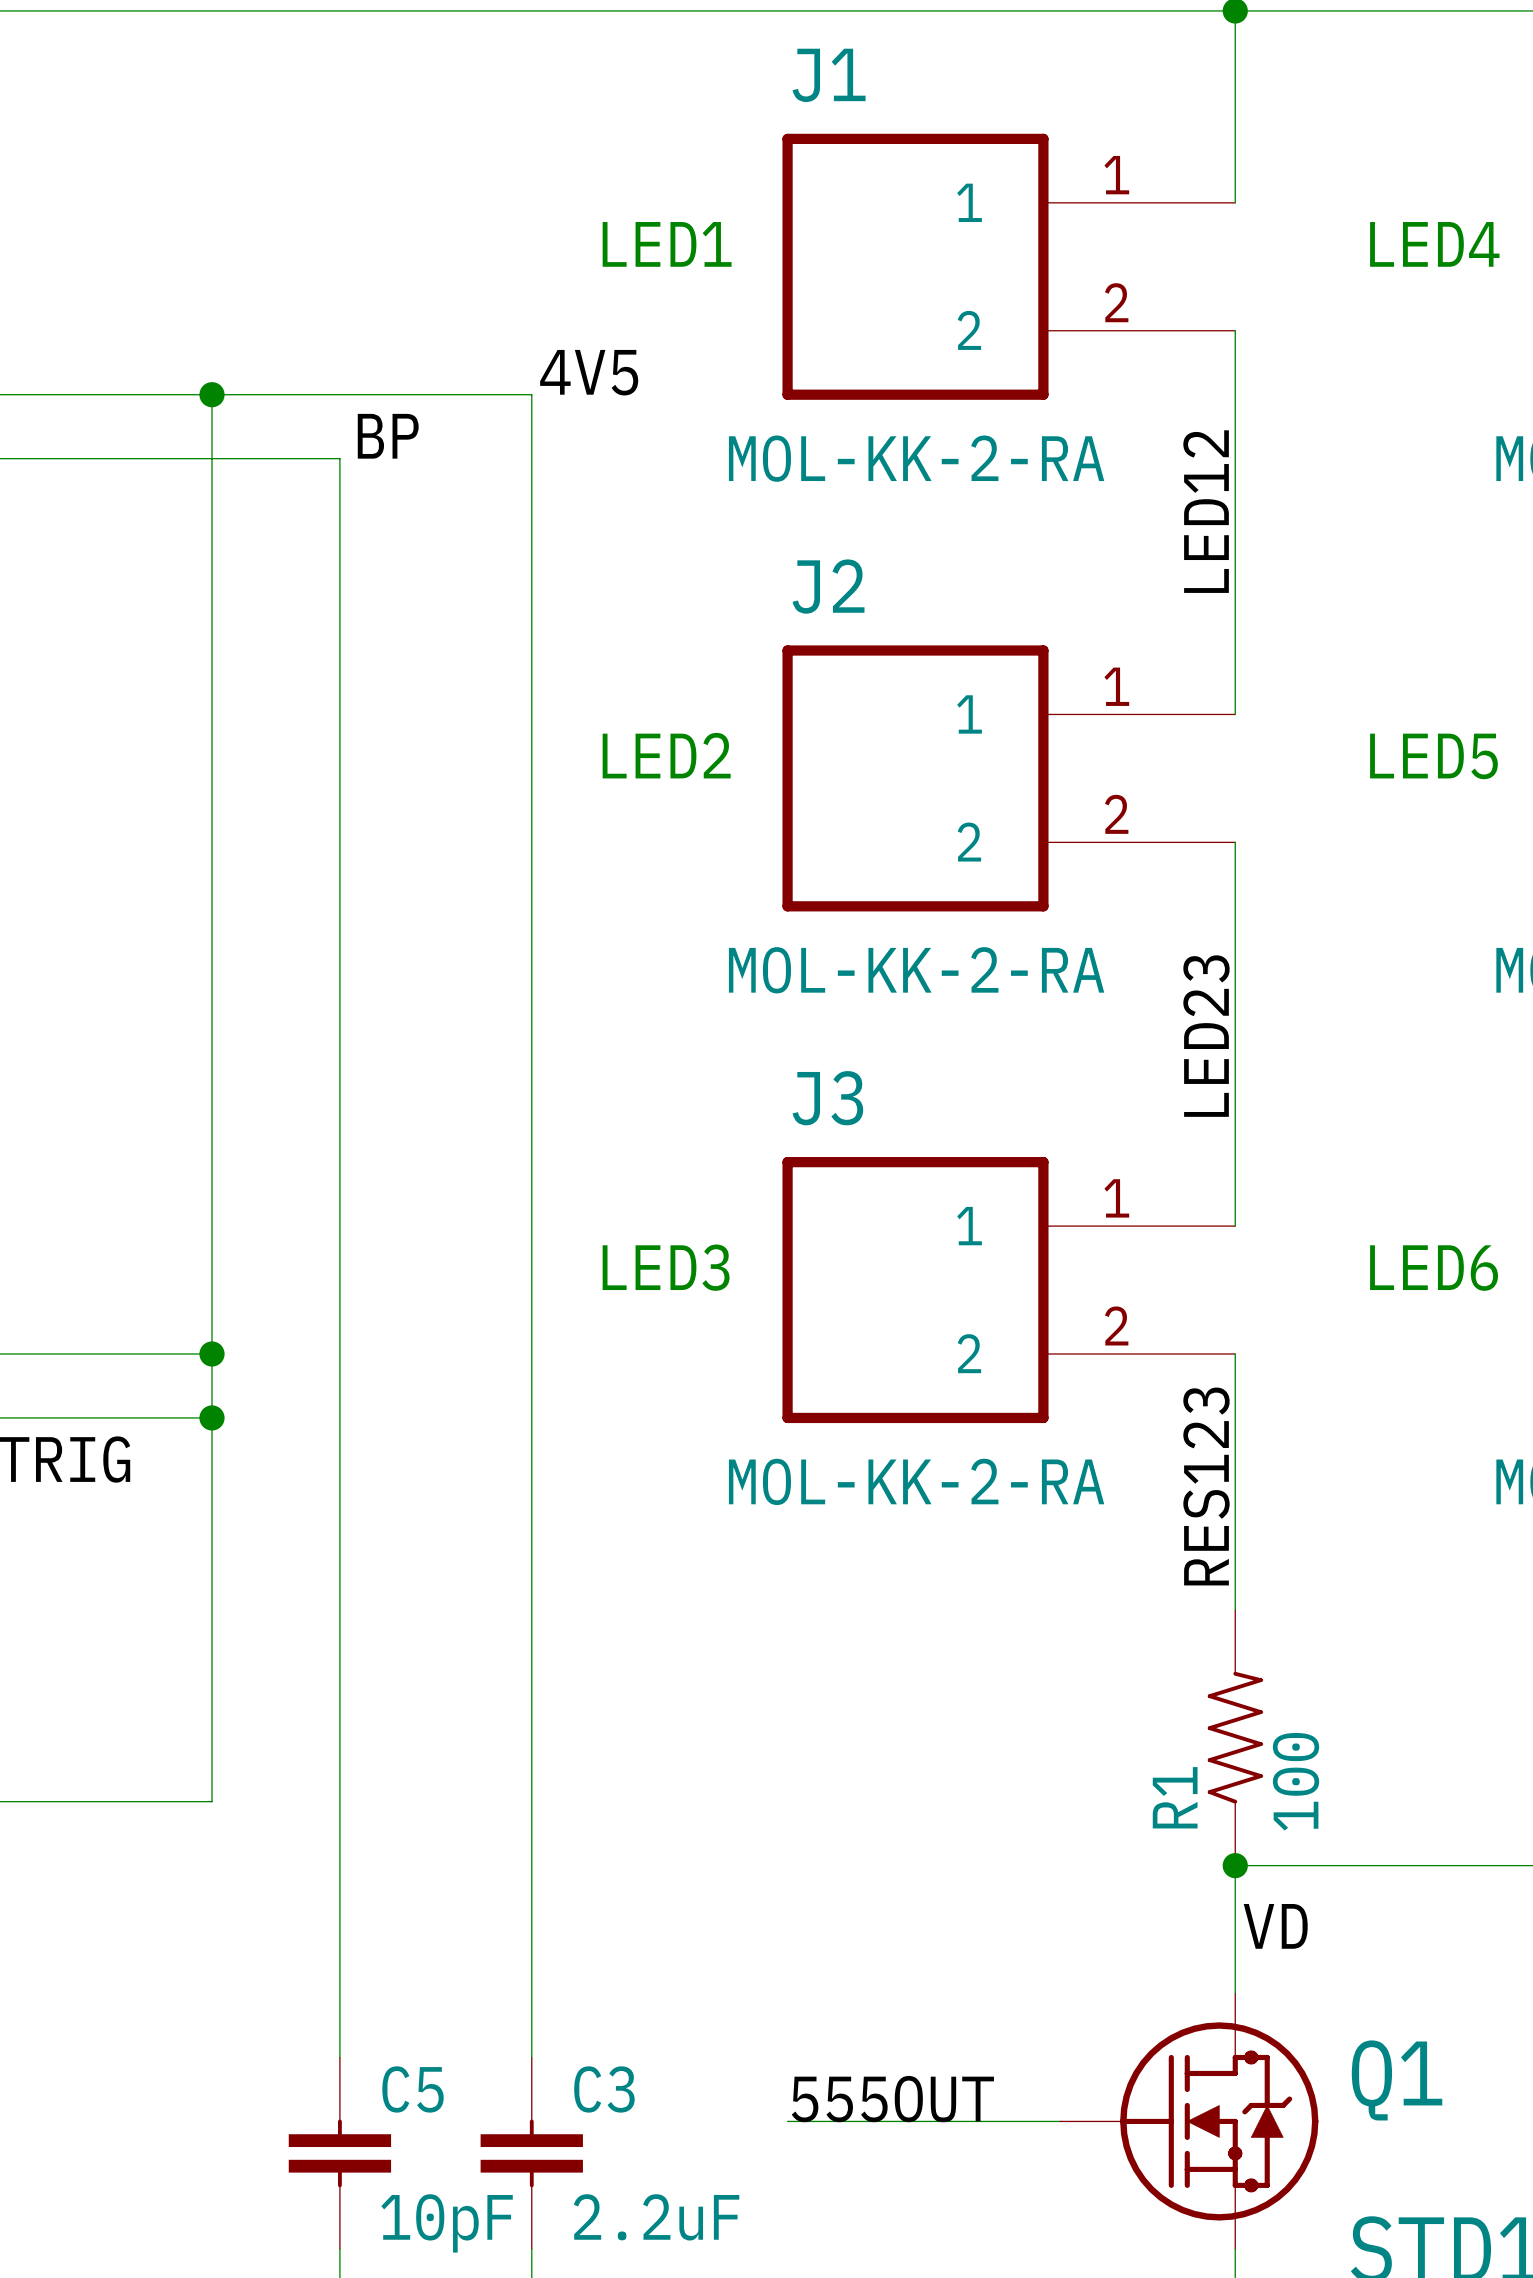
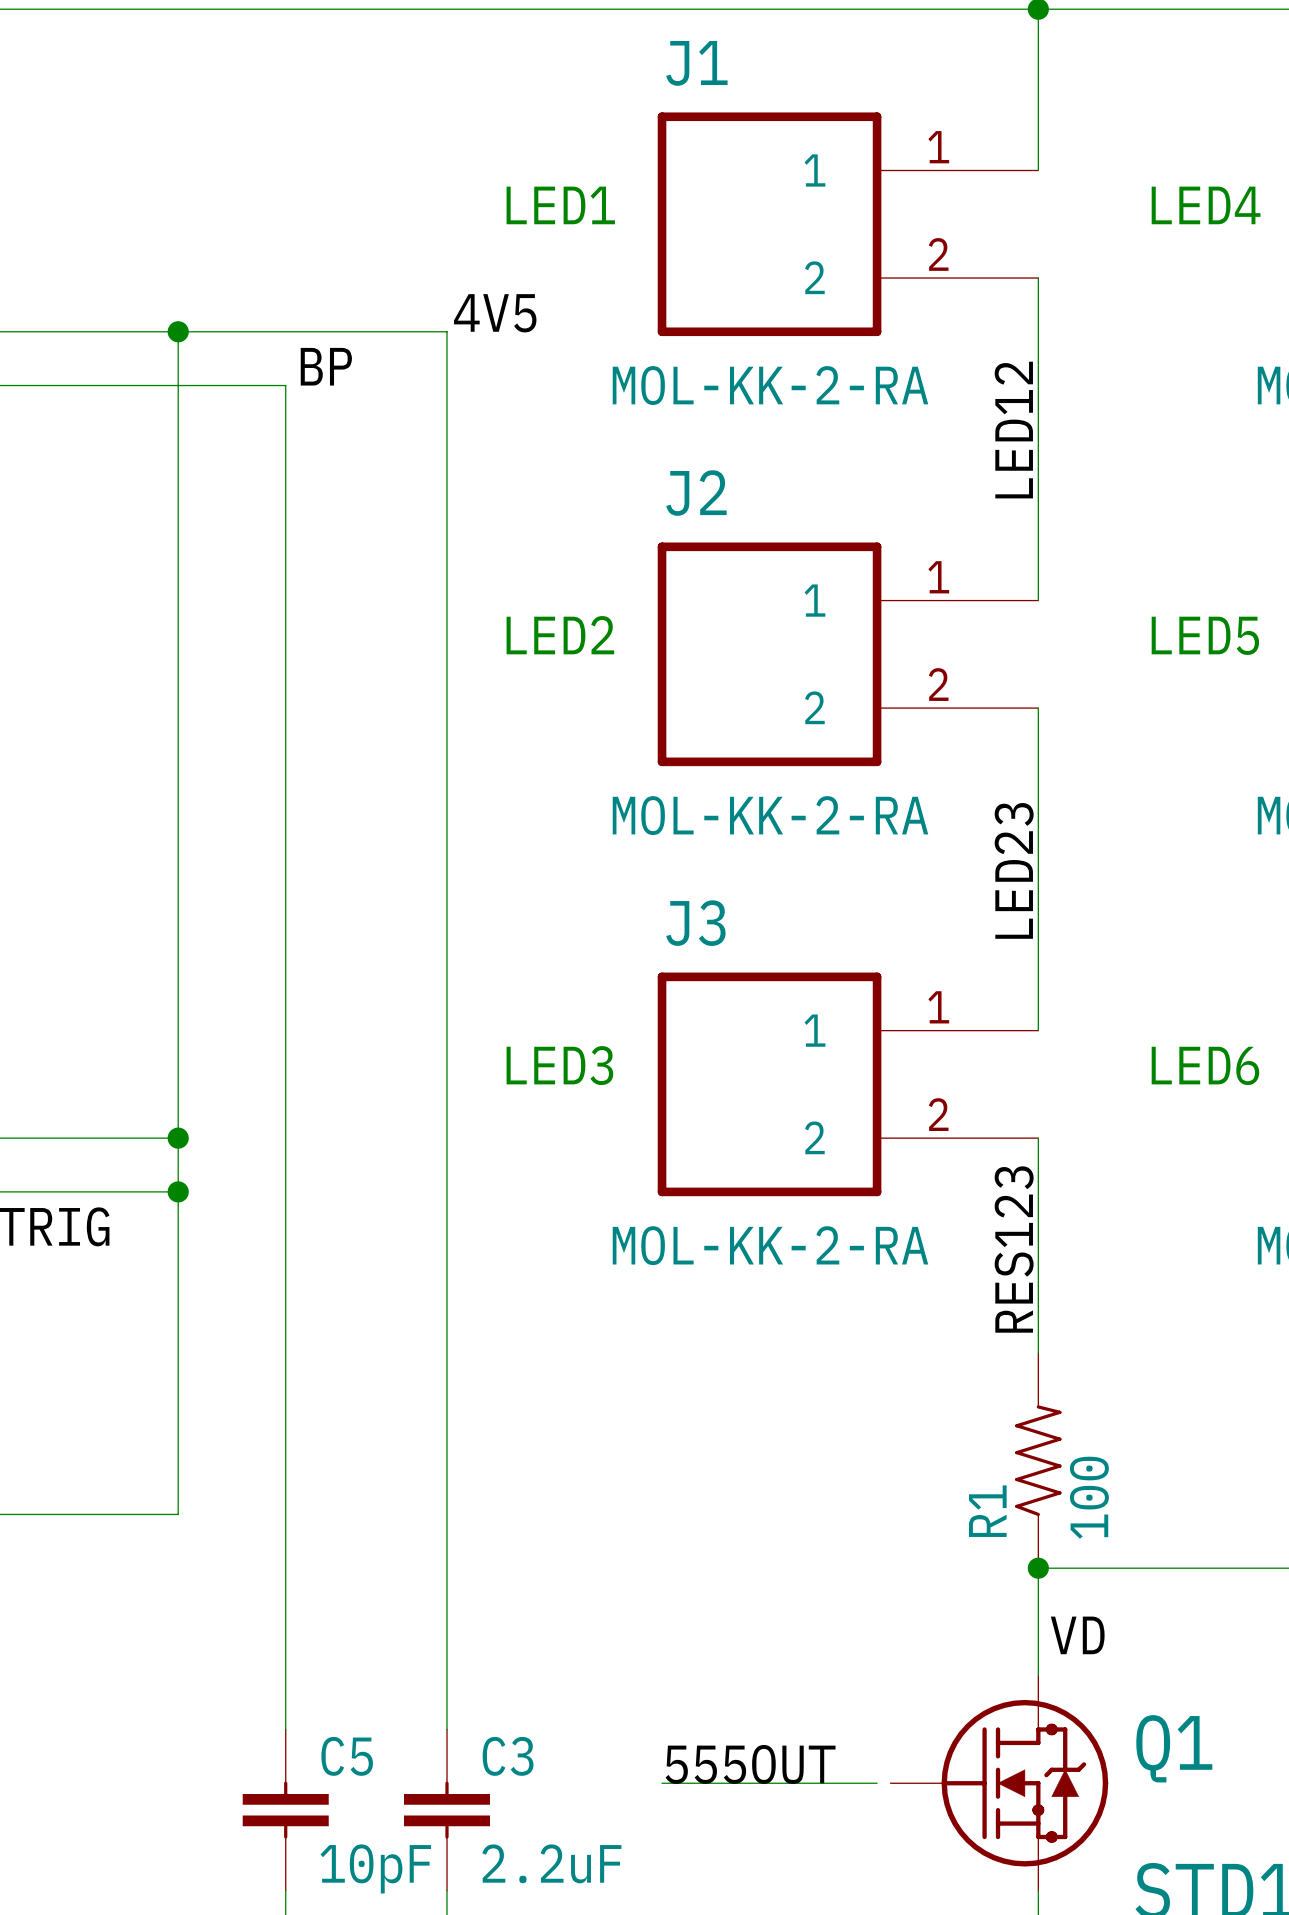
label position: VD (1275, 1926) -> VD (1077, 1635)
wire: (1043, 2121) (1059, 2121) -> none

